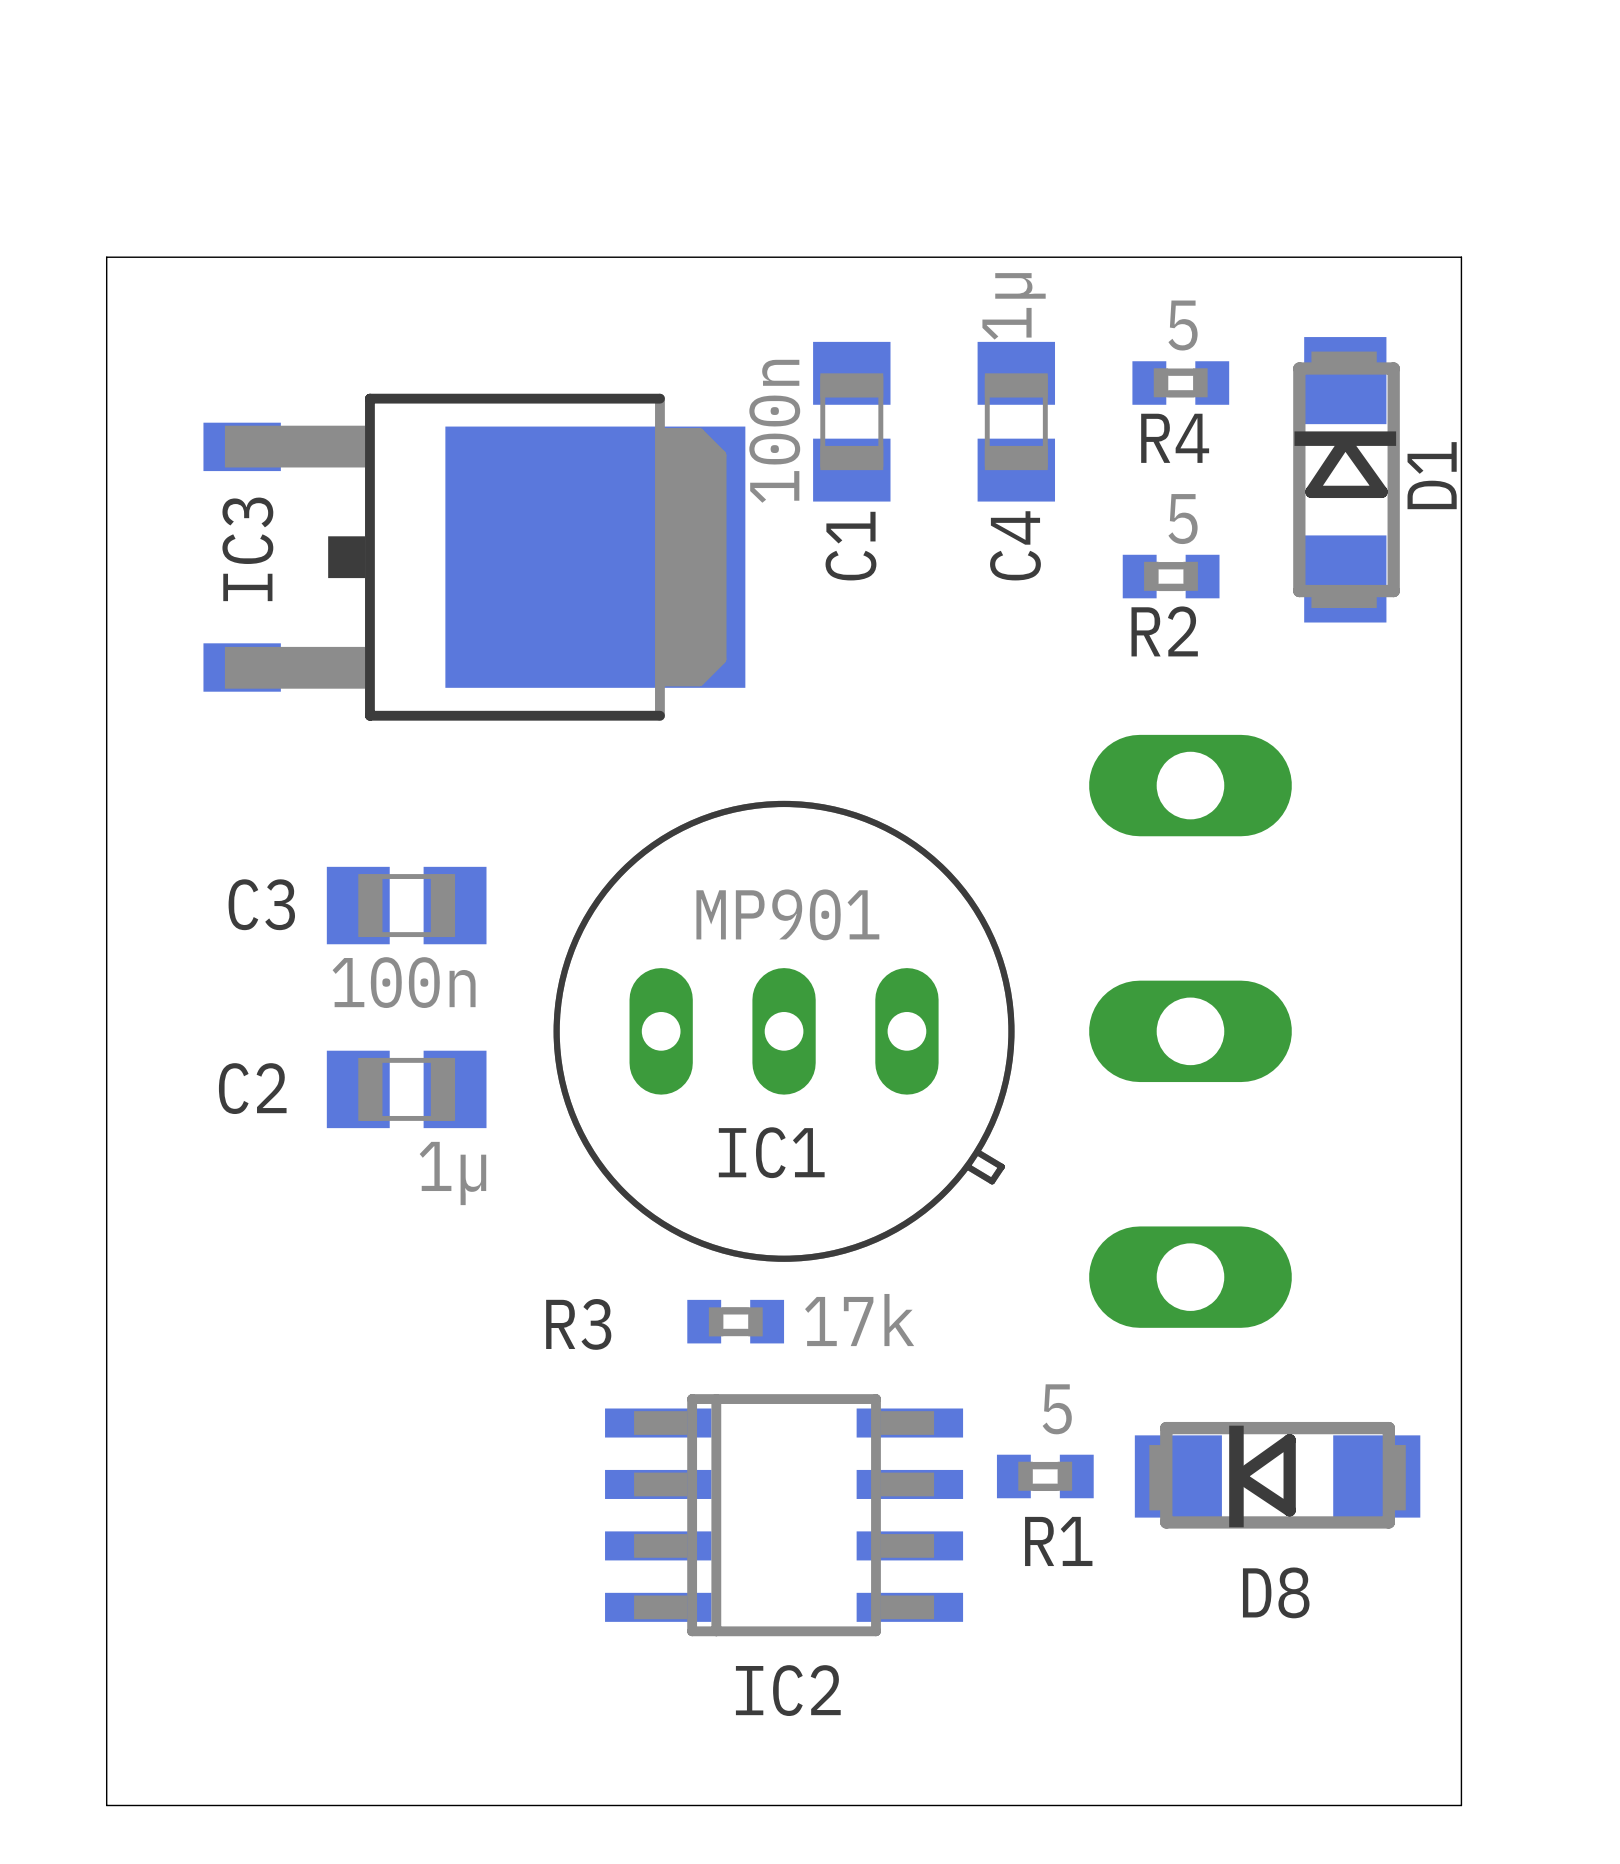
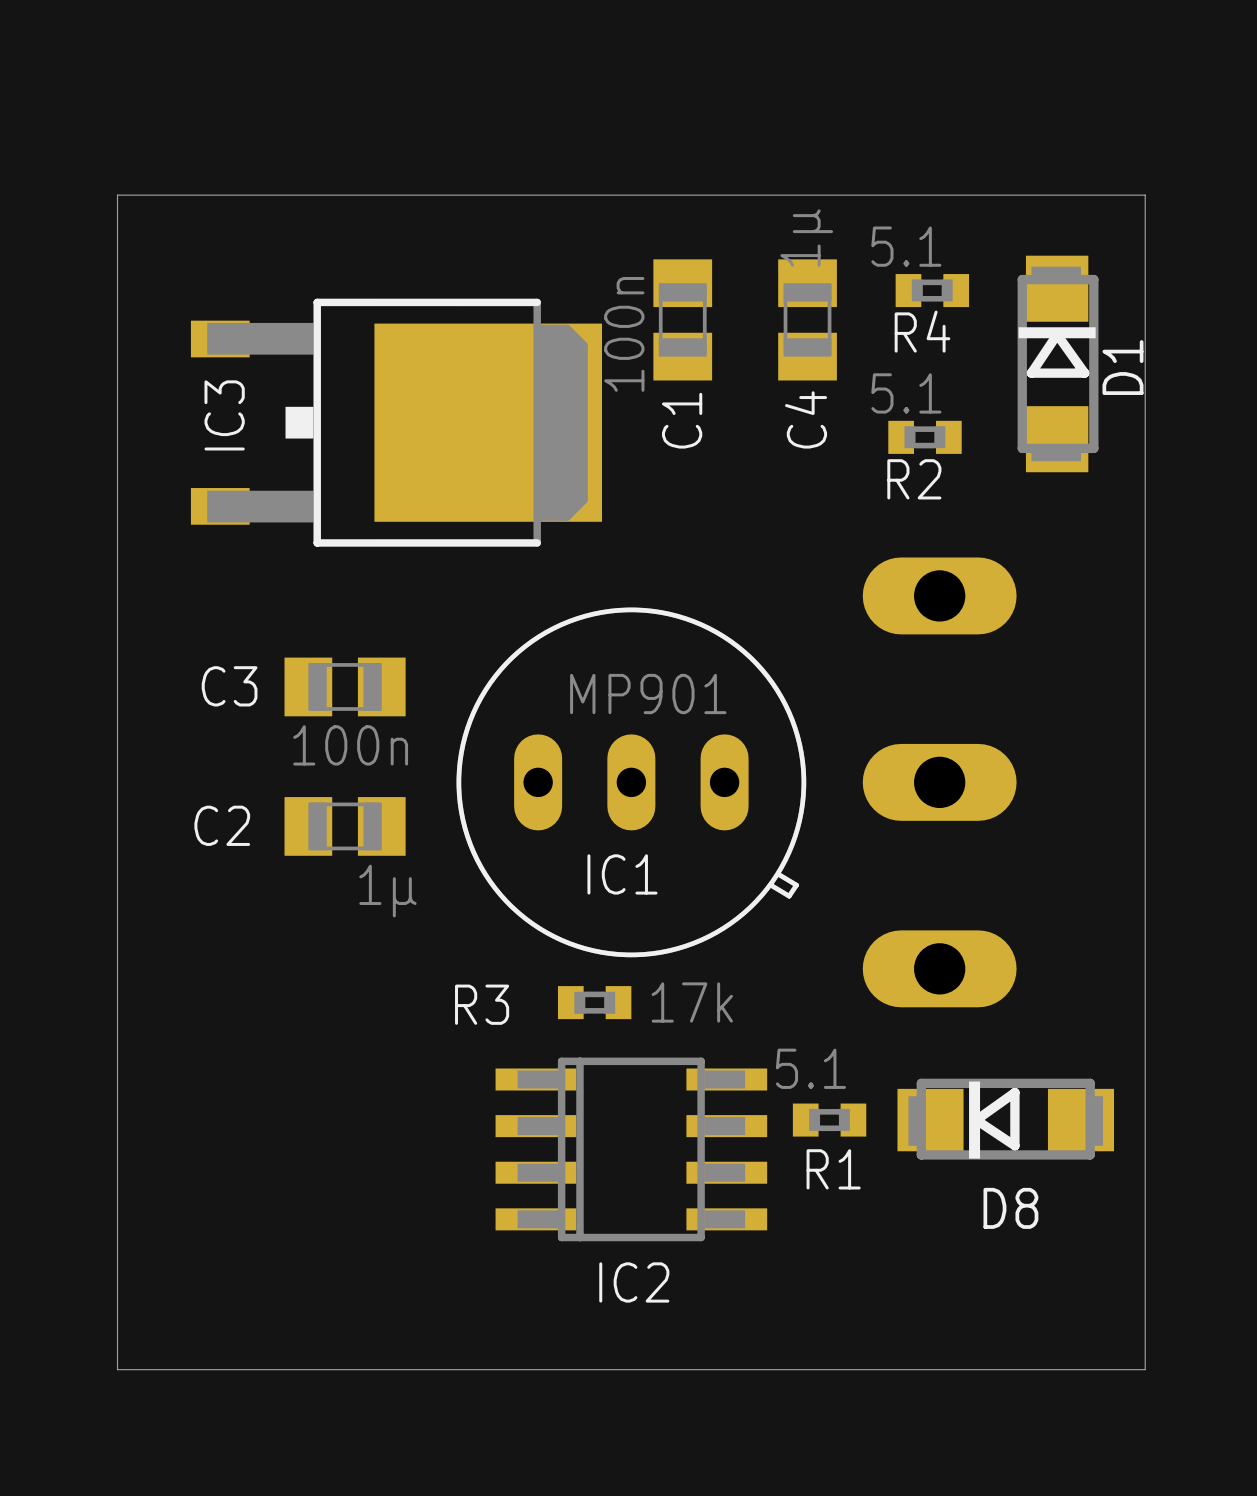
R4 value: 5 (1183, 325) -> 5.1 (906, 246)
R2 value: 5 (1183, 519) -> 5.1 (906, 393)
R1 value: 5 (1057, 1409) -> 5.1 (810, 1068)

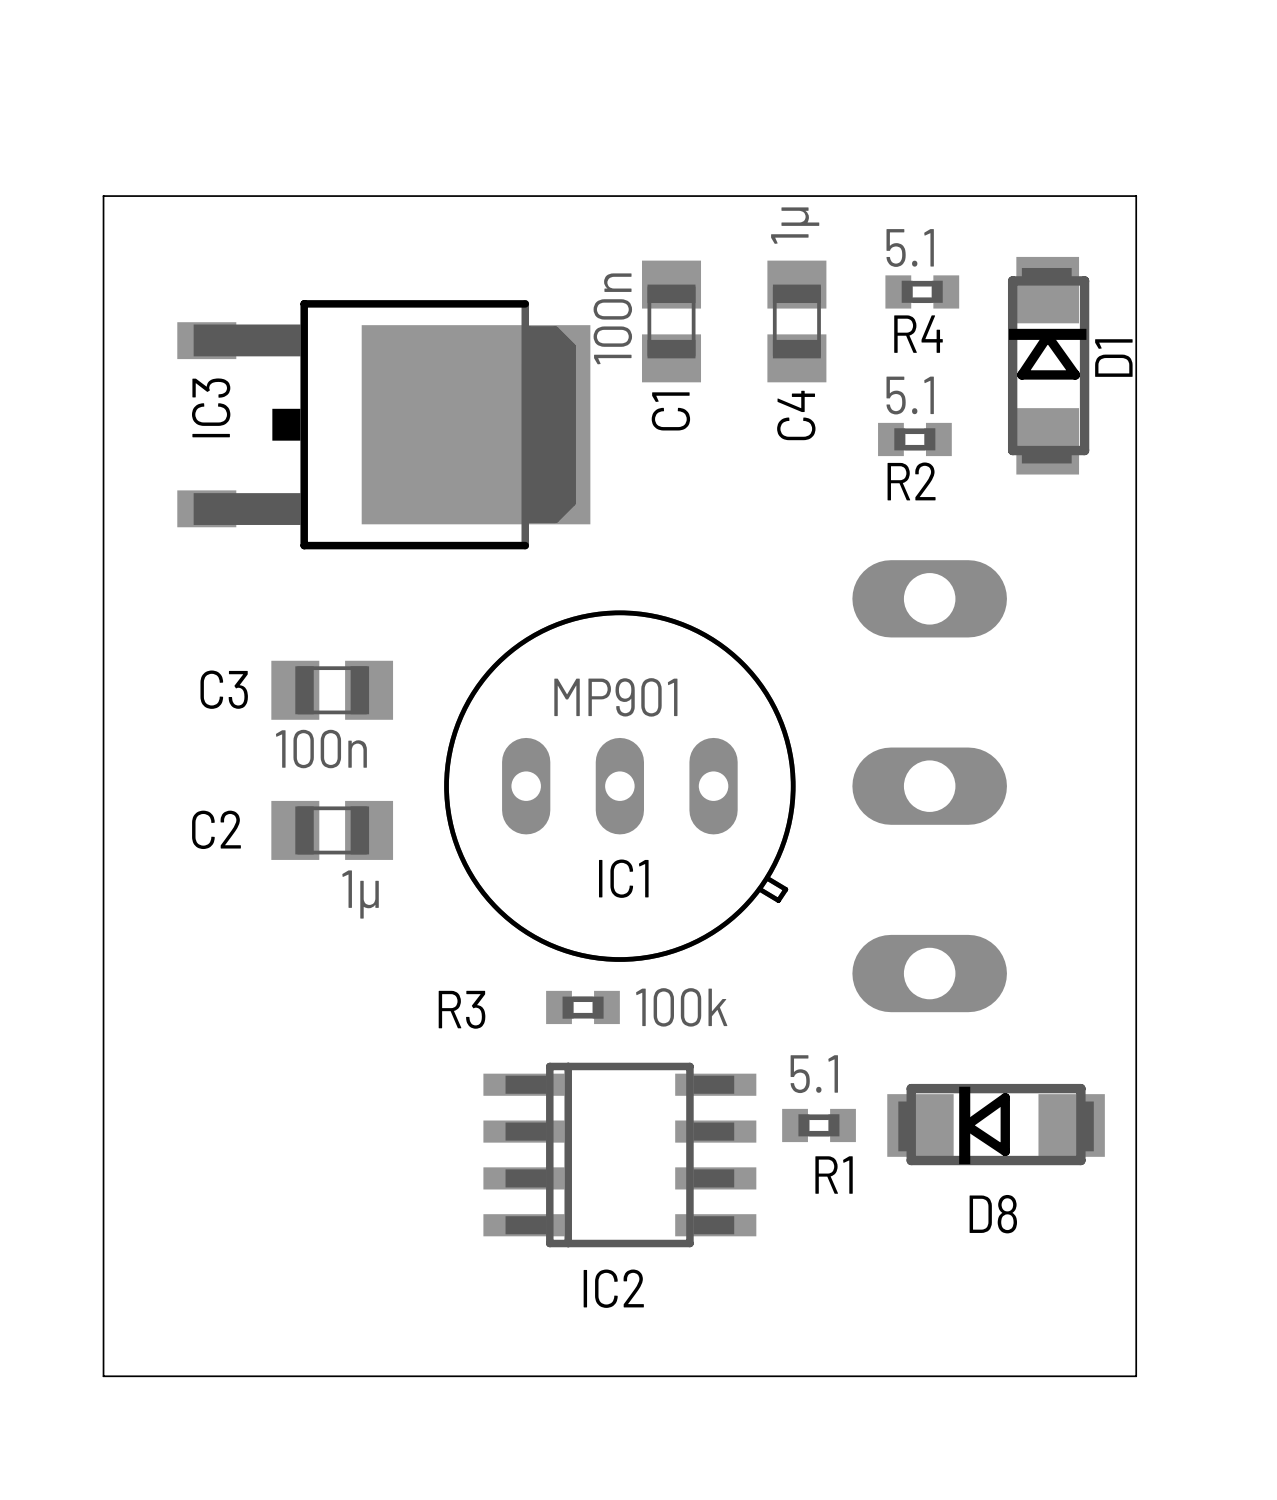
R3 value: 17k (692, 1002) -> 100k (681, 1007)

